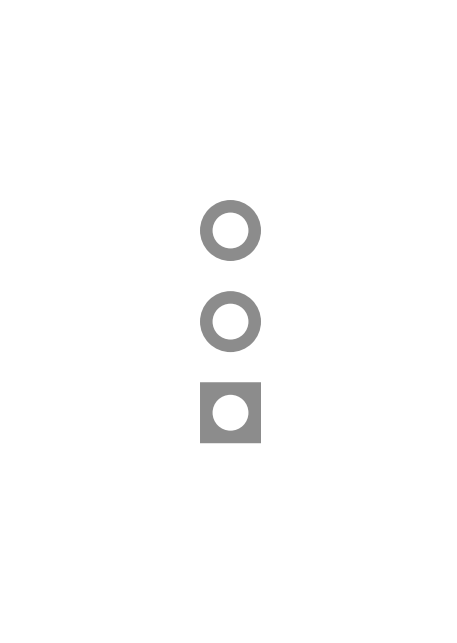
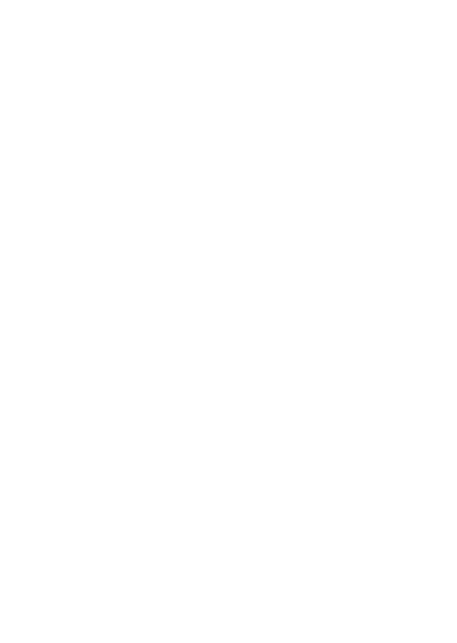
part: (230, 321) -> none

